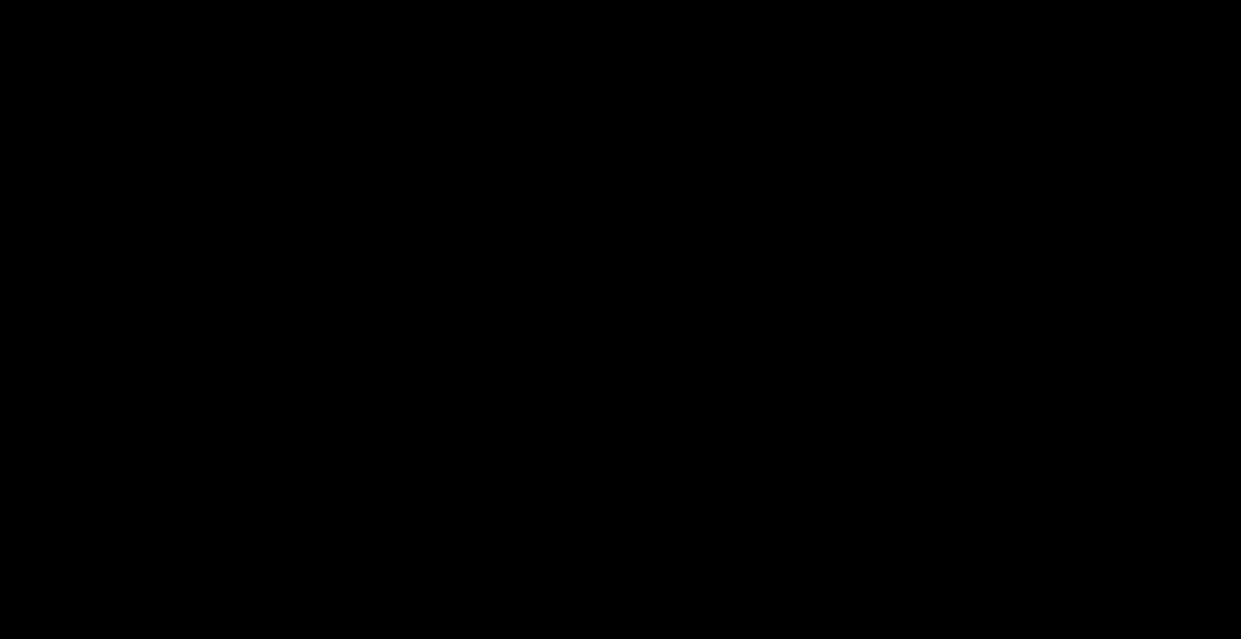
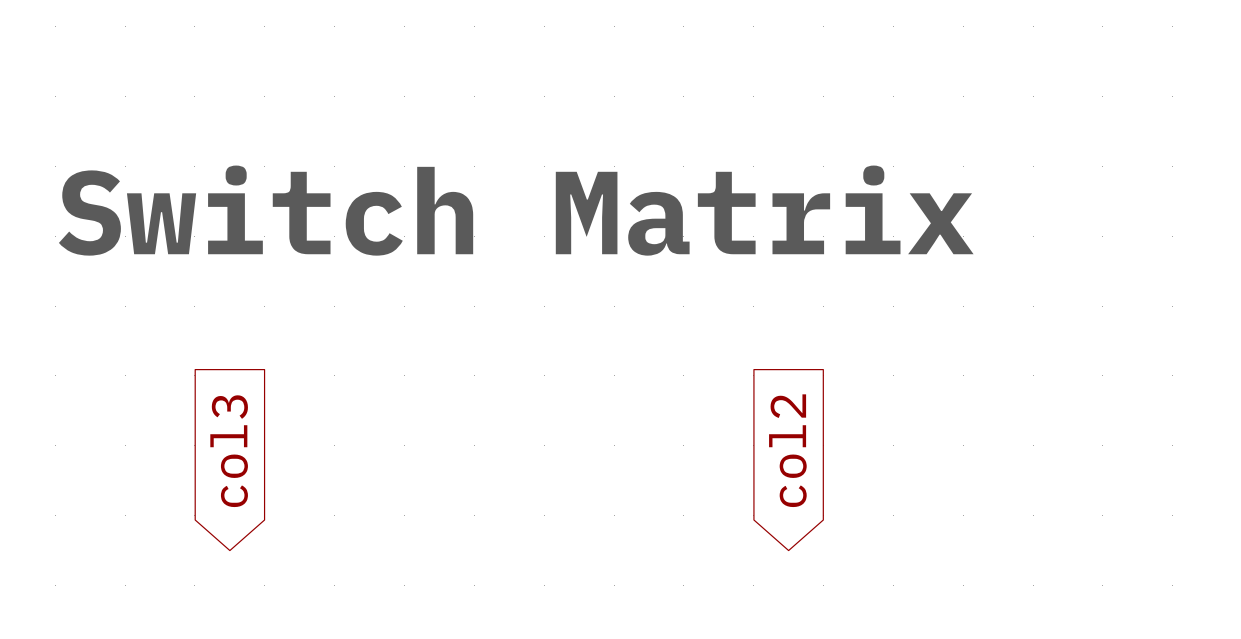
text: none -> Switch Matrix (516, 210)
global label: none -> col3 (229, 451)
global label: none -> col2 (787, 450)

